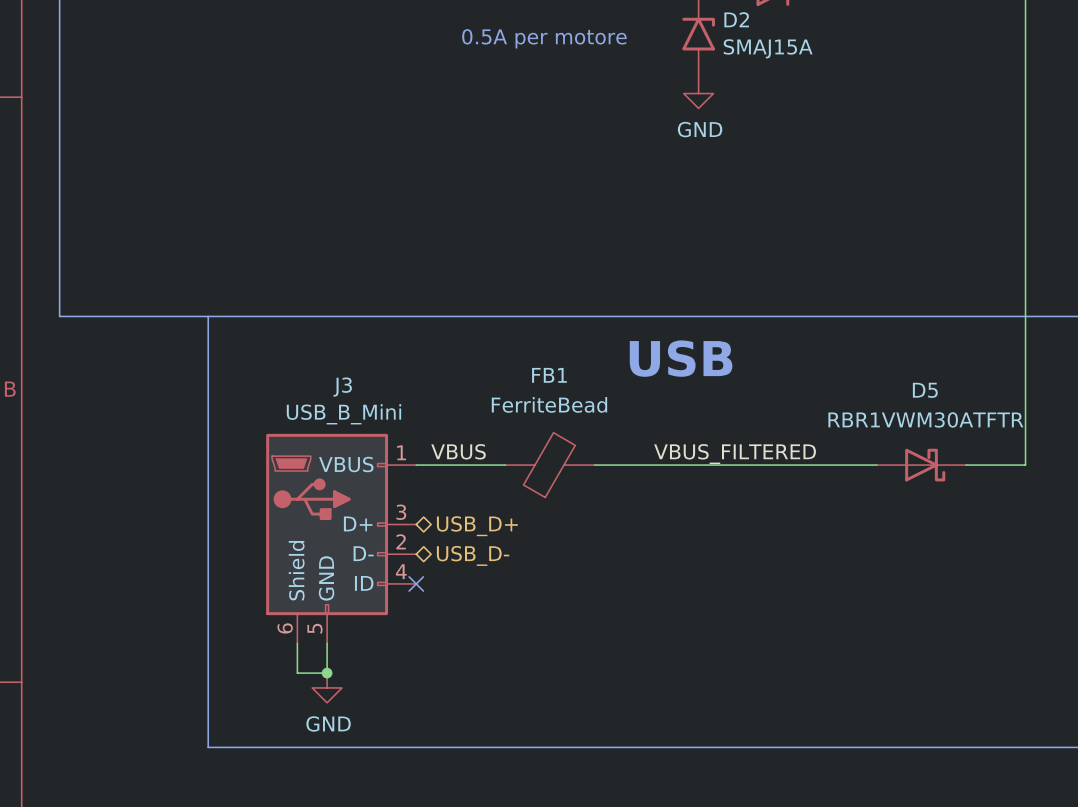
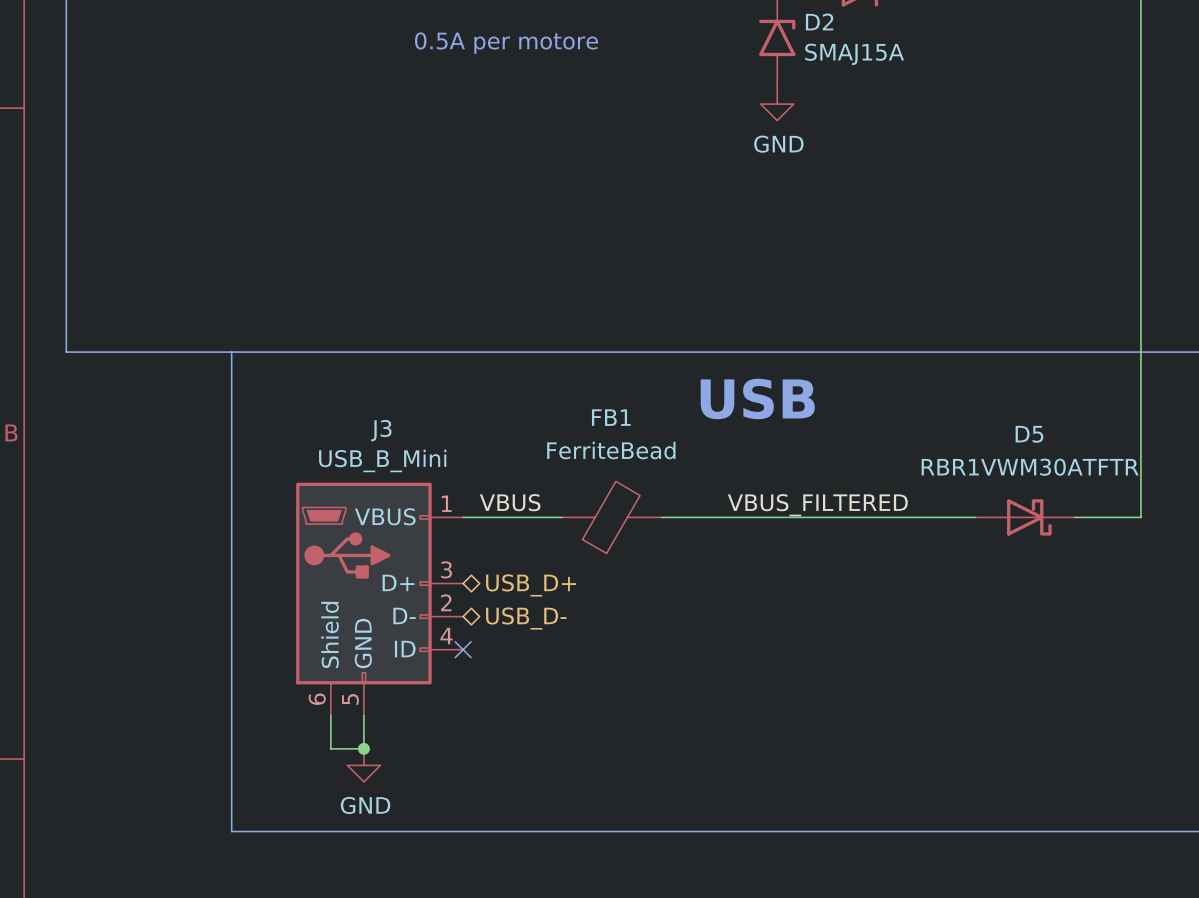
text position: 0.5A per motore (544, 38) -> 0.5A per motore (506, 43)

